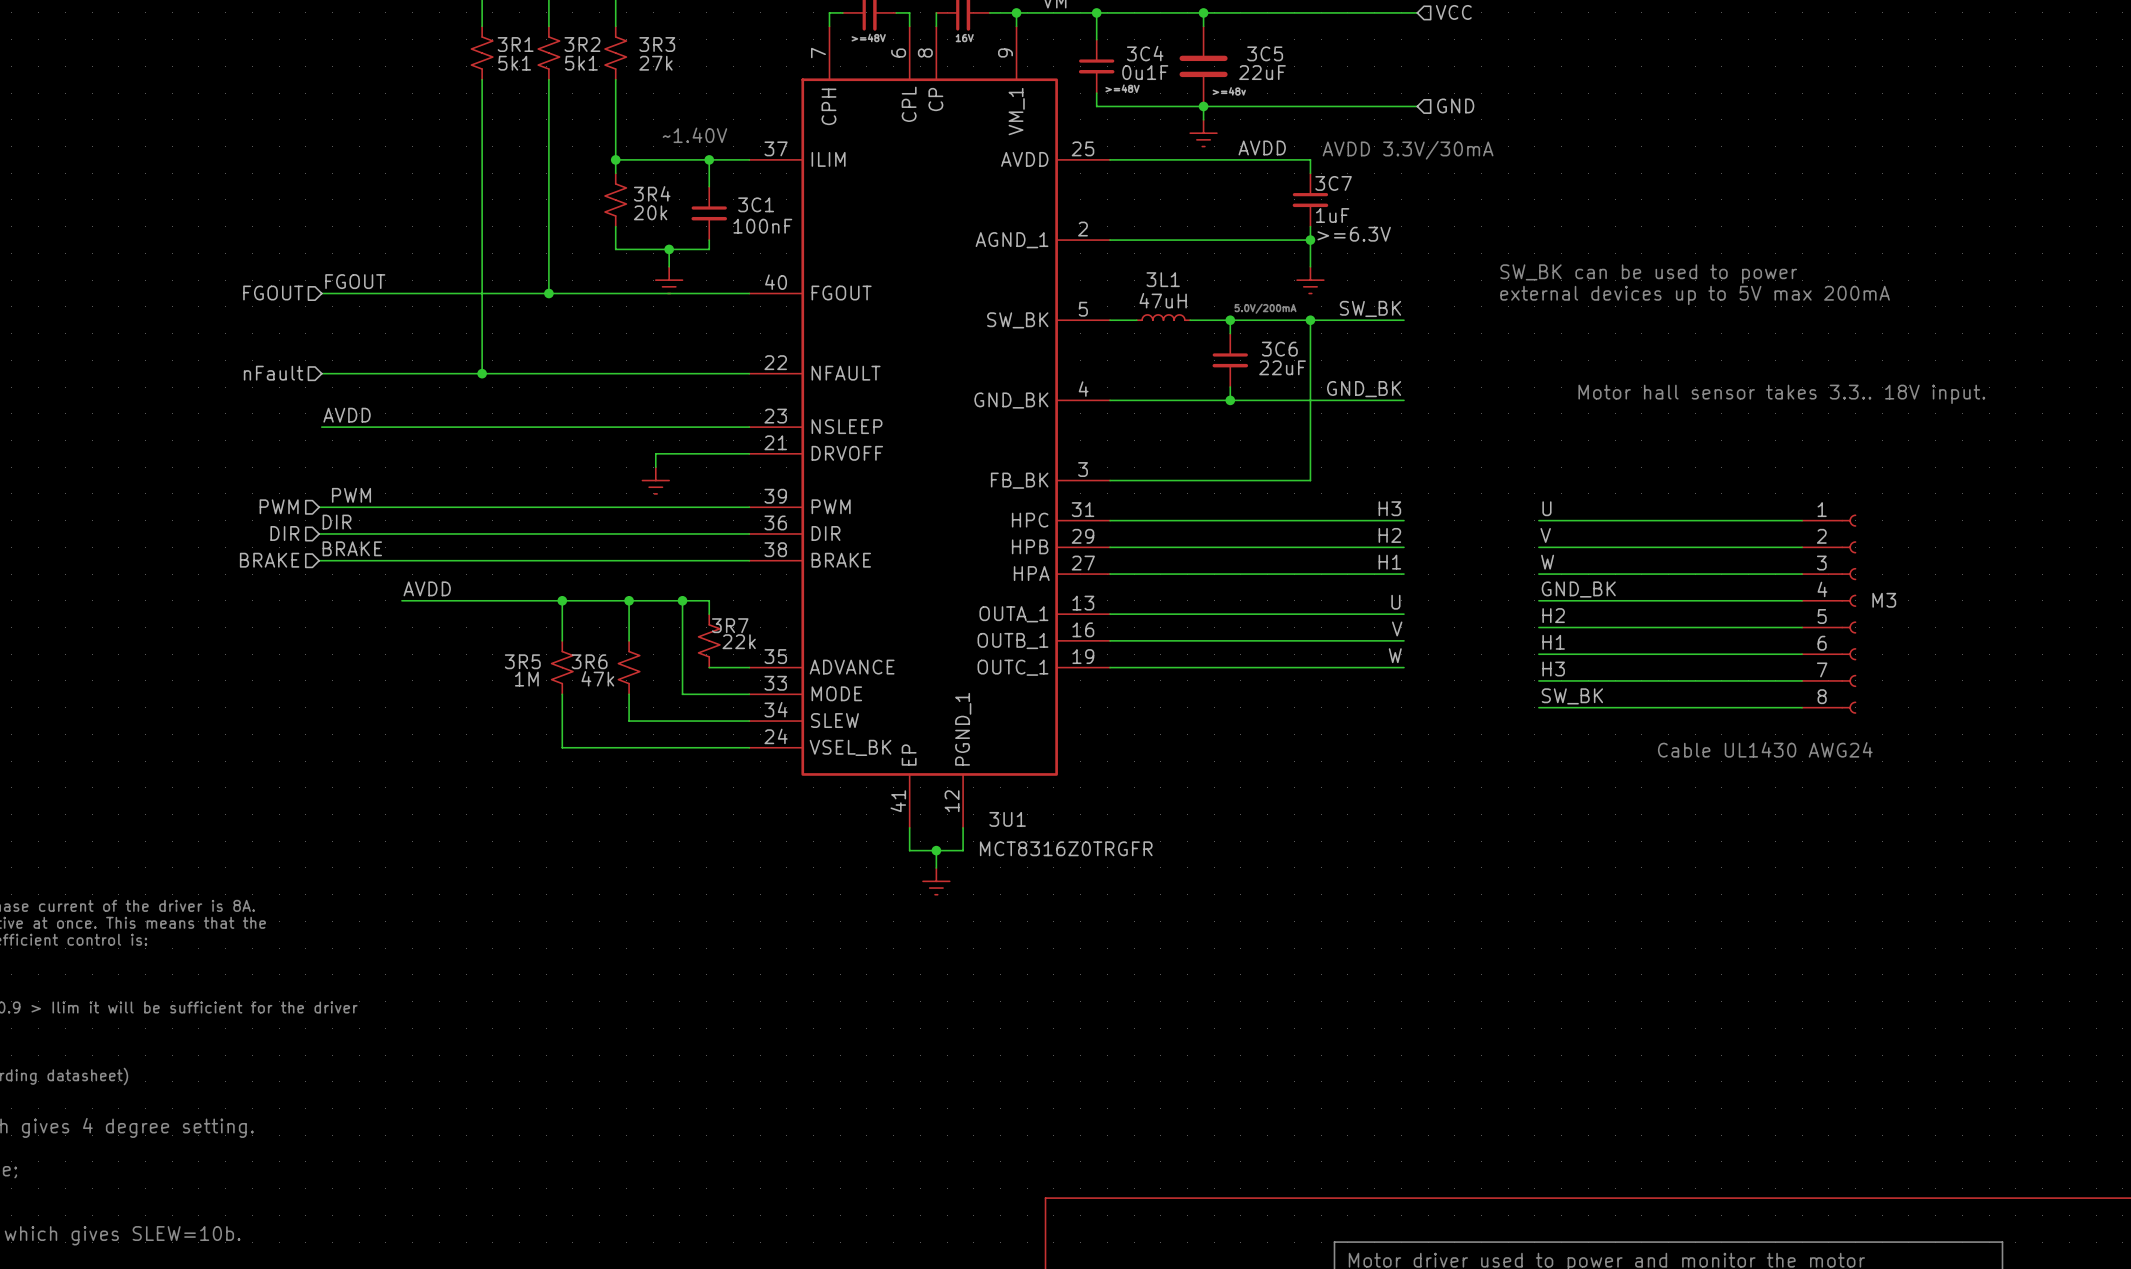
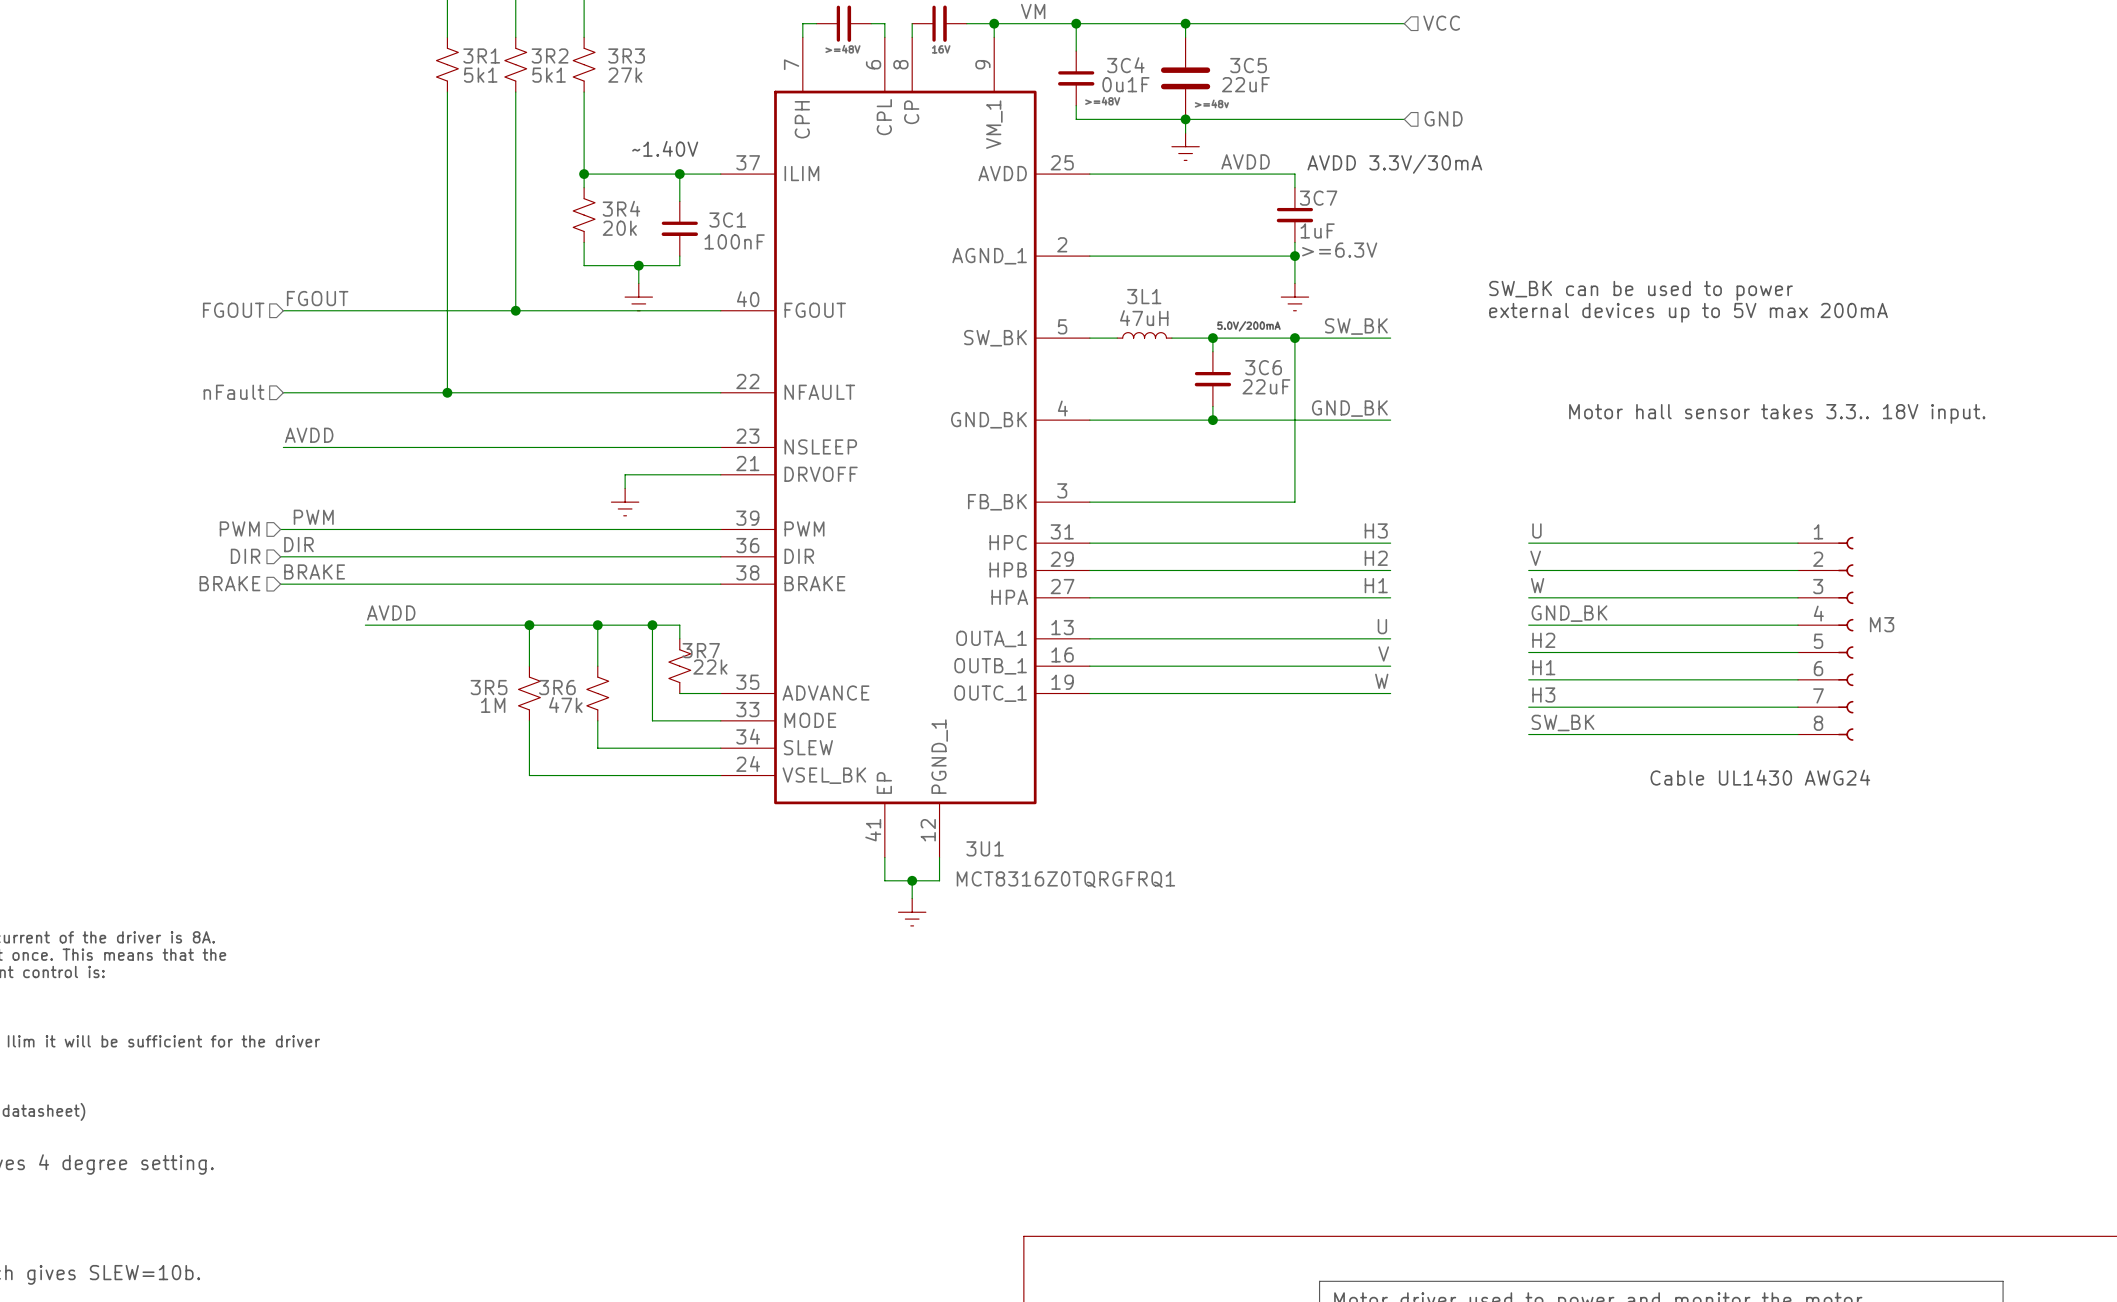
3U1 value: MCT8316Z0TRGFR (1066, 848) -> MCT8316Z0TQRGFRQ1 (1065, 879)

